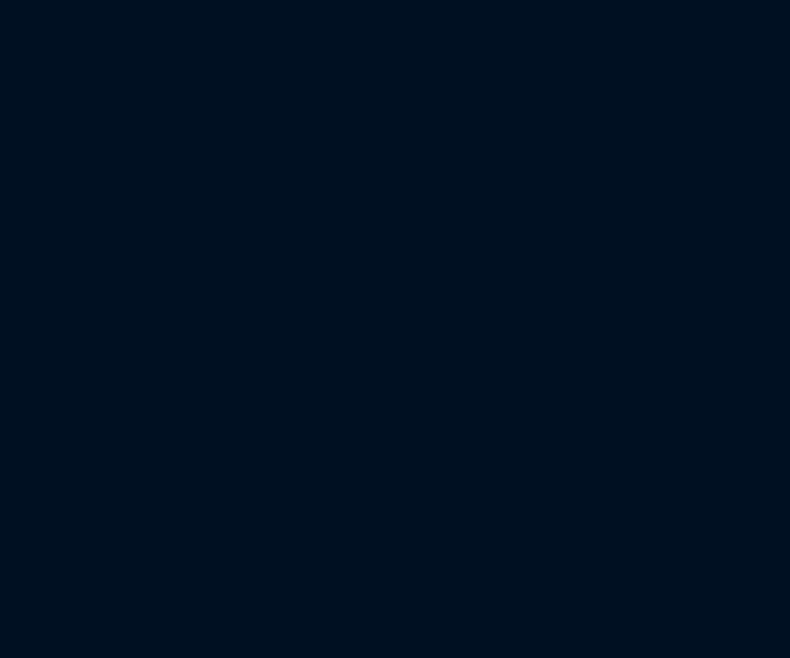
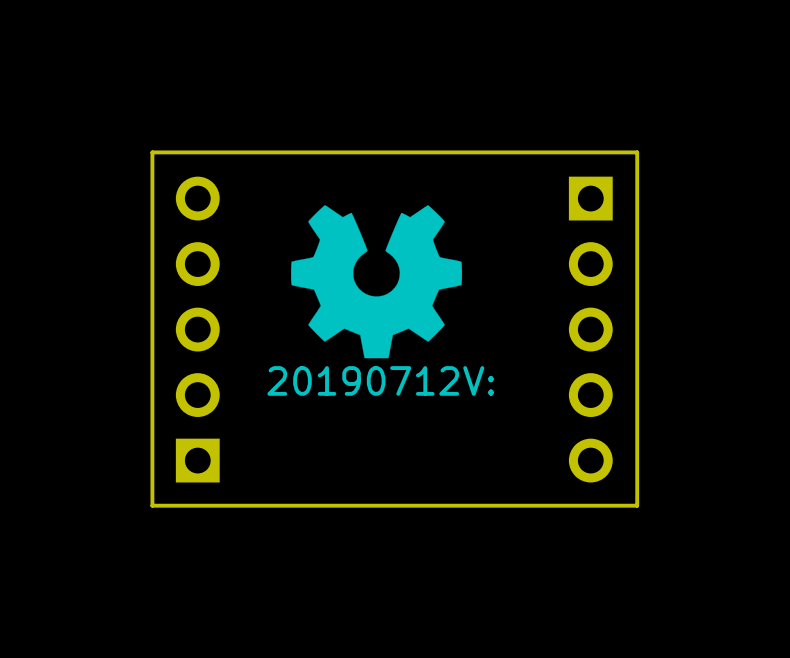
board edge: none -> (637, 152) (637, 505) (152, 505) (152, 152) (637, 152)
drawing: none -> [291, 205, 463, 359]
part: none -> (197, 329)
part: none -> (590, 329)

